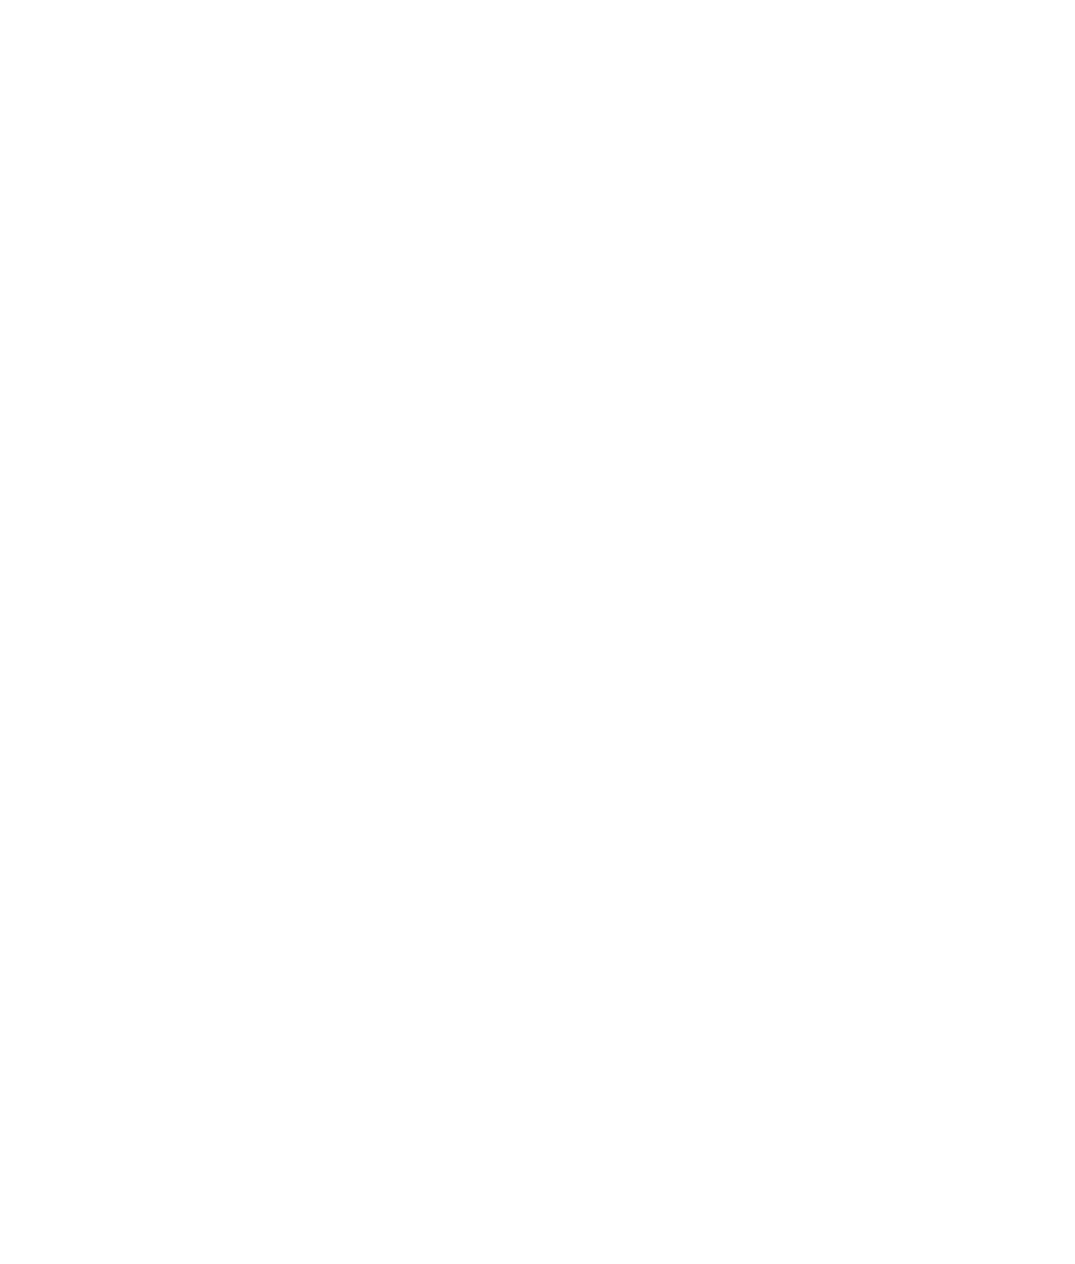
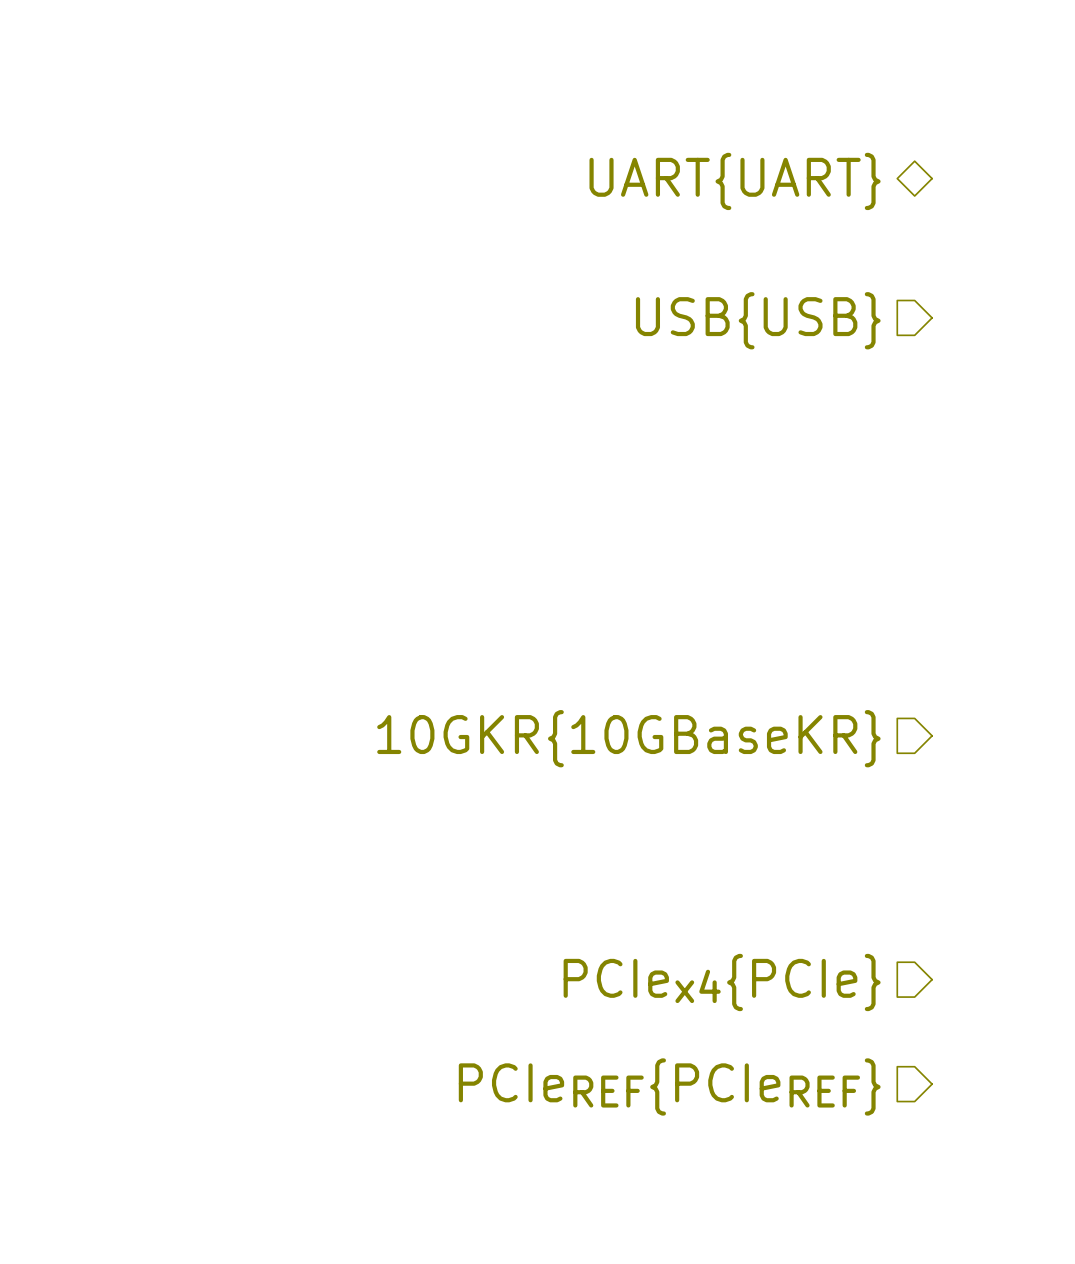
hierarchical label: none -> UART{UART} (735, 181)
hierarchical label: none -> USB{USB} (758, 320)
hierarchical label: none -> 10GKR{10GBaseKR} (628, 738)
hierarchical label: none -> PCIex4{PCIe} (722, 982)
hierarchical label: none -> PCIeREF{PCIeREF} (669, 1086)

